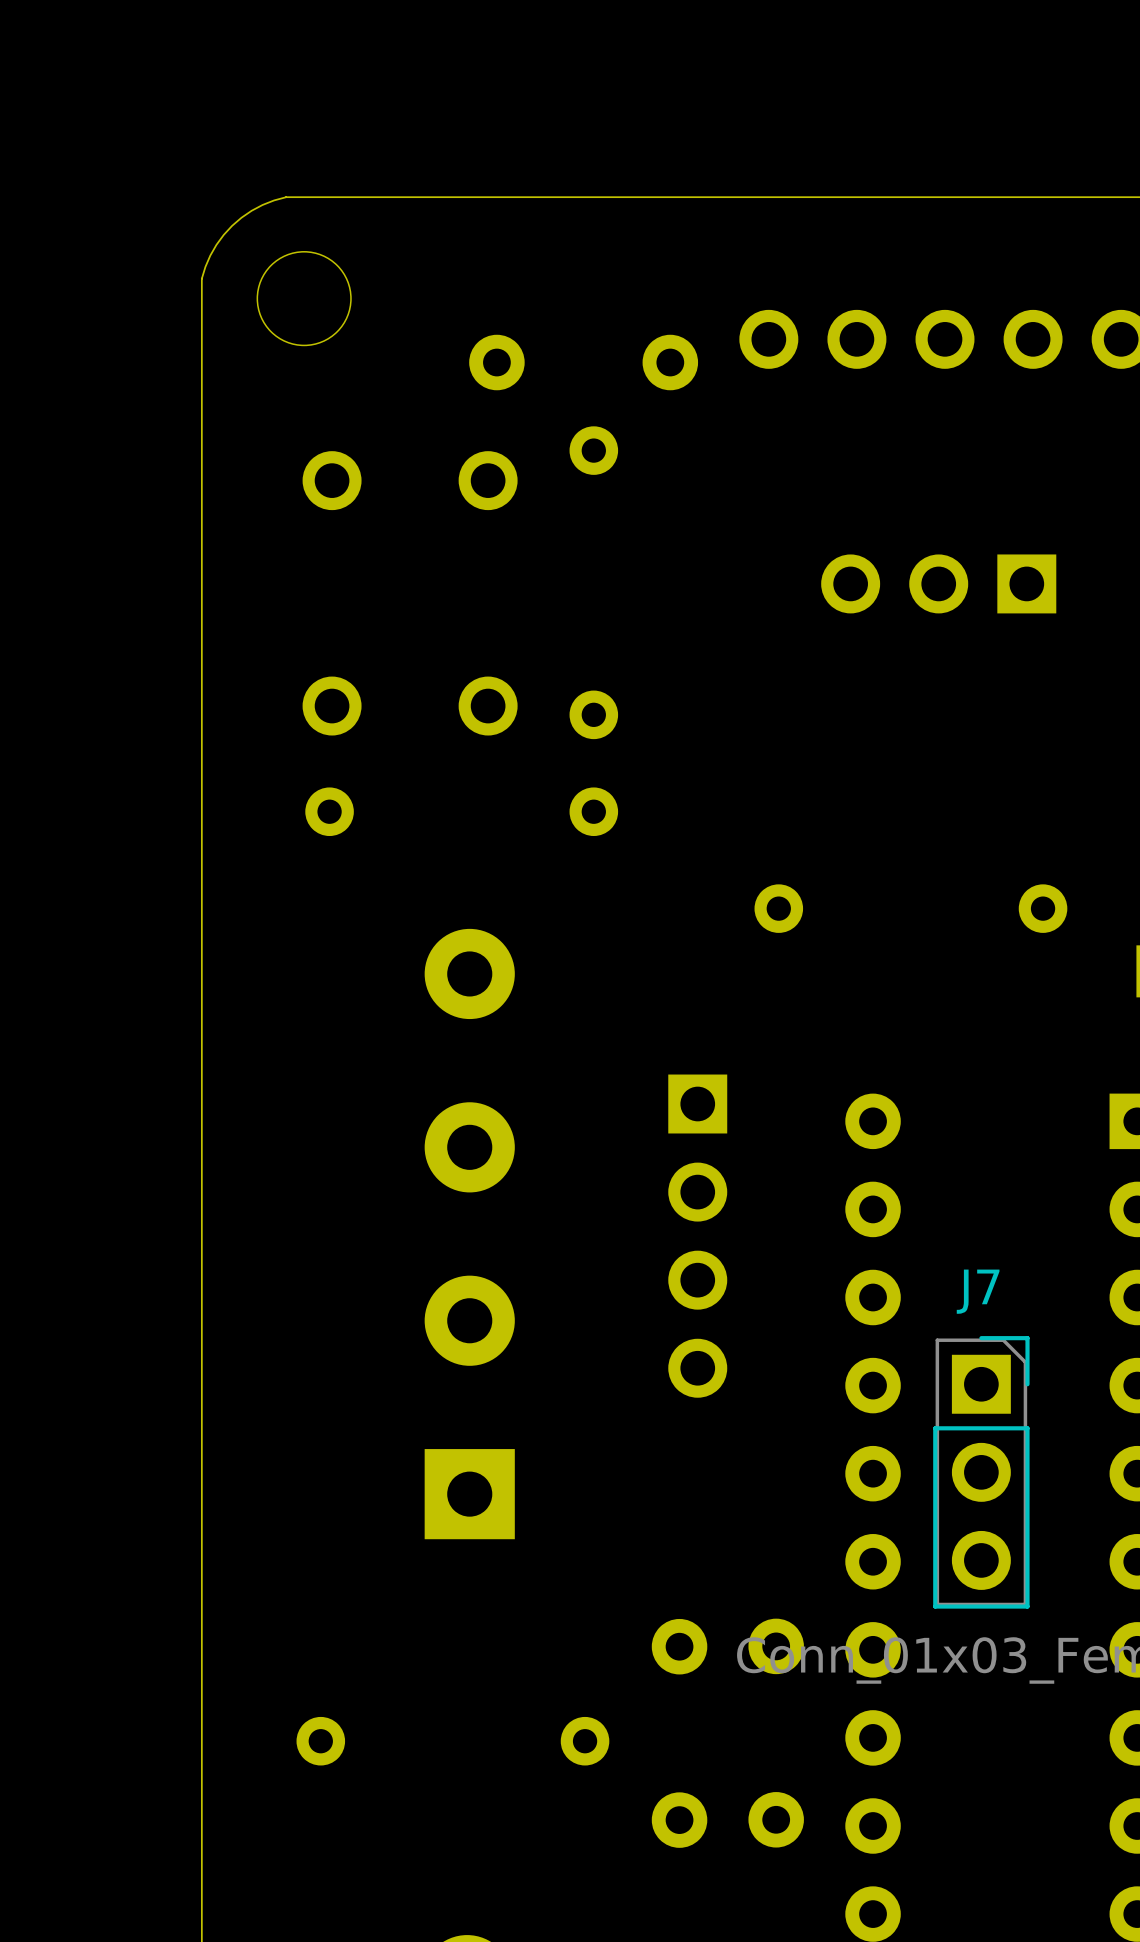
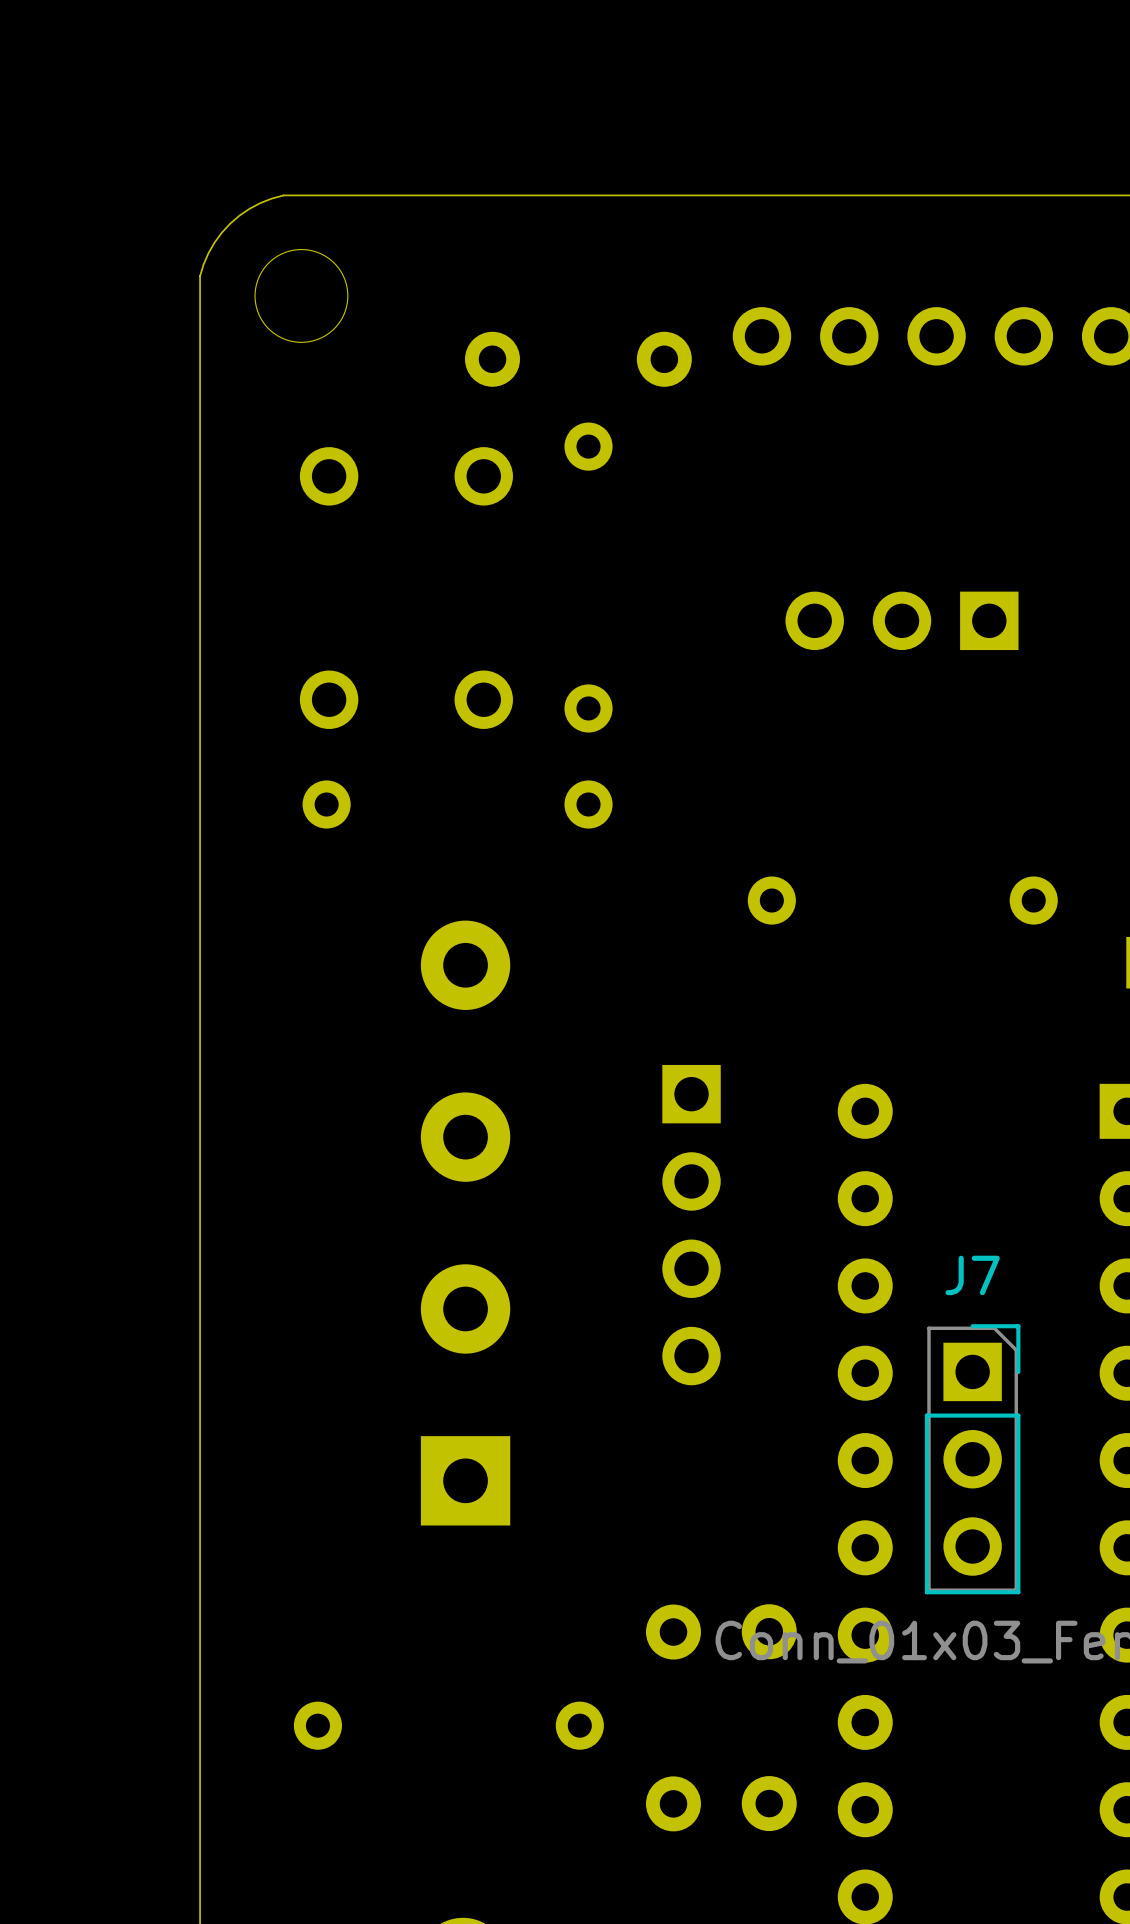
part position: (938, 583) -> (902, 620)

